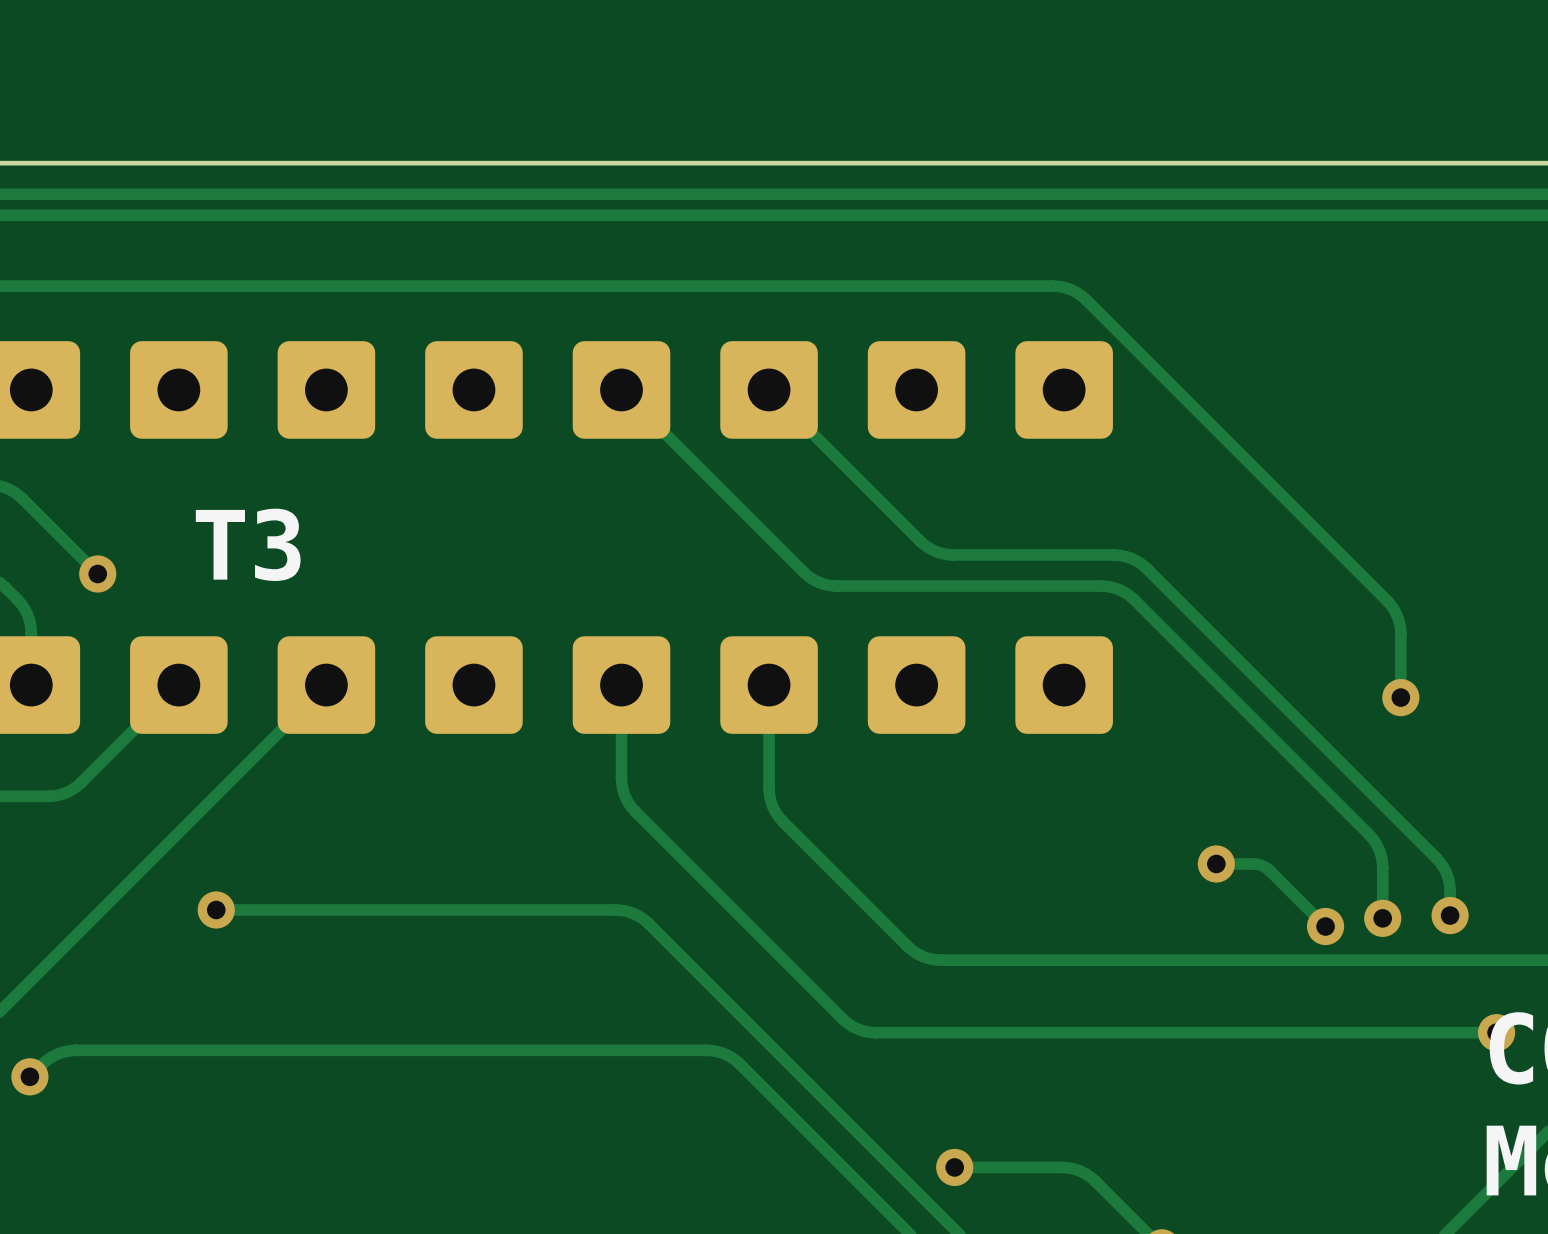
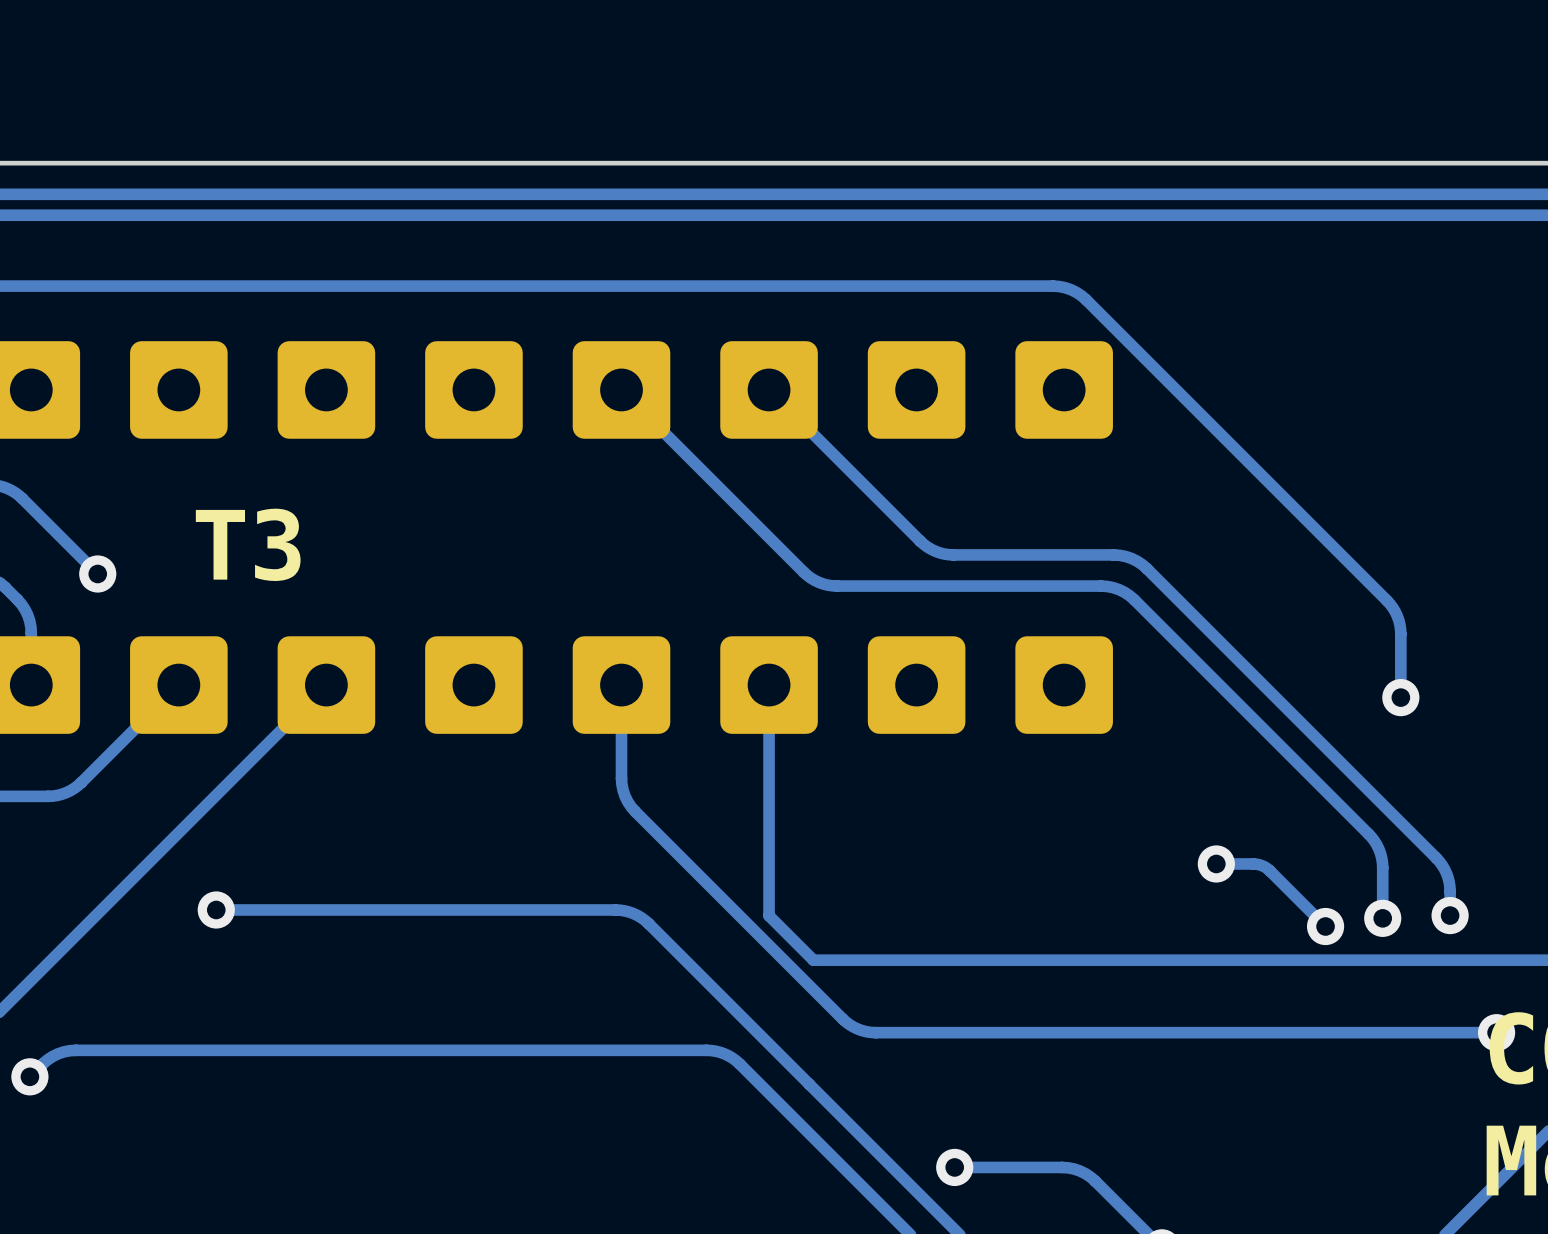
track: (769, 788) (772, 806) (779, 818) (907, 946) (922, 956) (941, 960) -> (769, 788) (769, 915) (813, 960) (941, 960)

